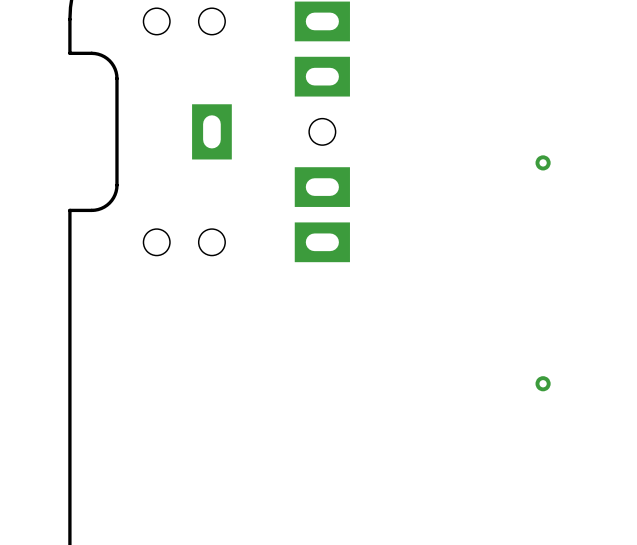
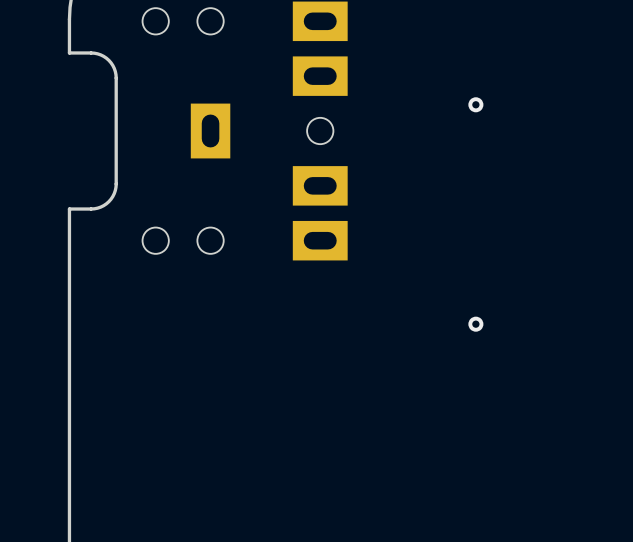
via position: (543, 162) -> (475, 104)
via position: (543, 383) -> (475, 324)

